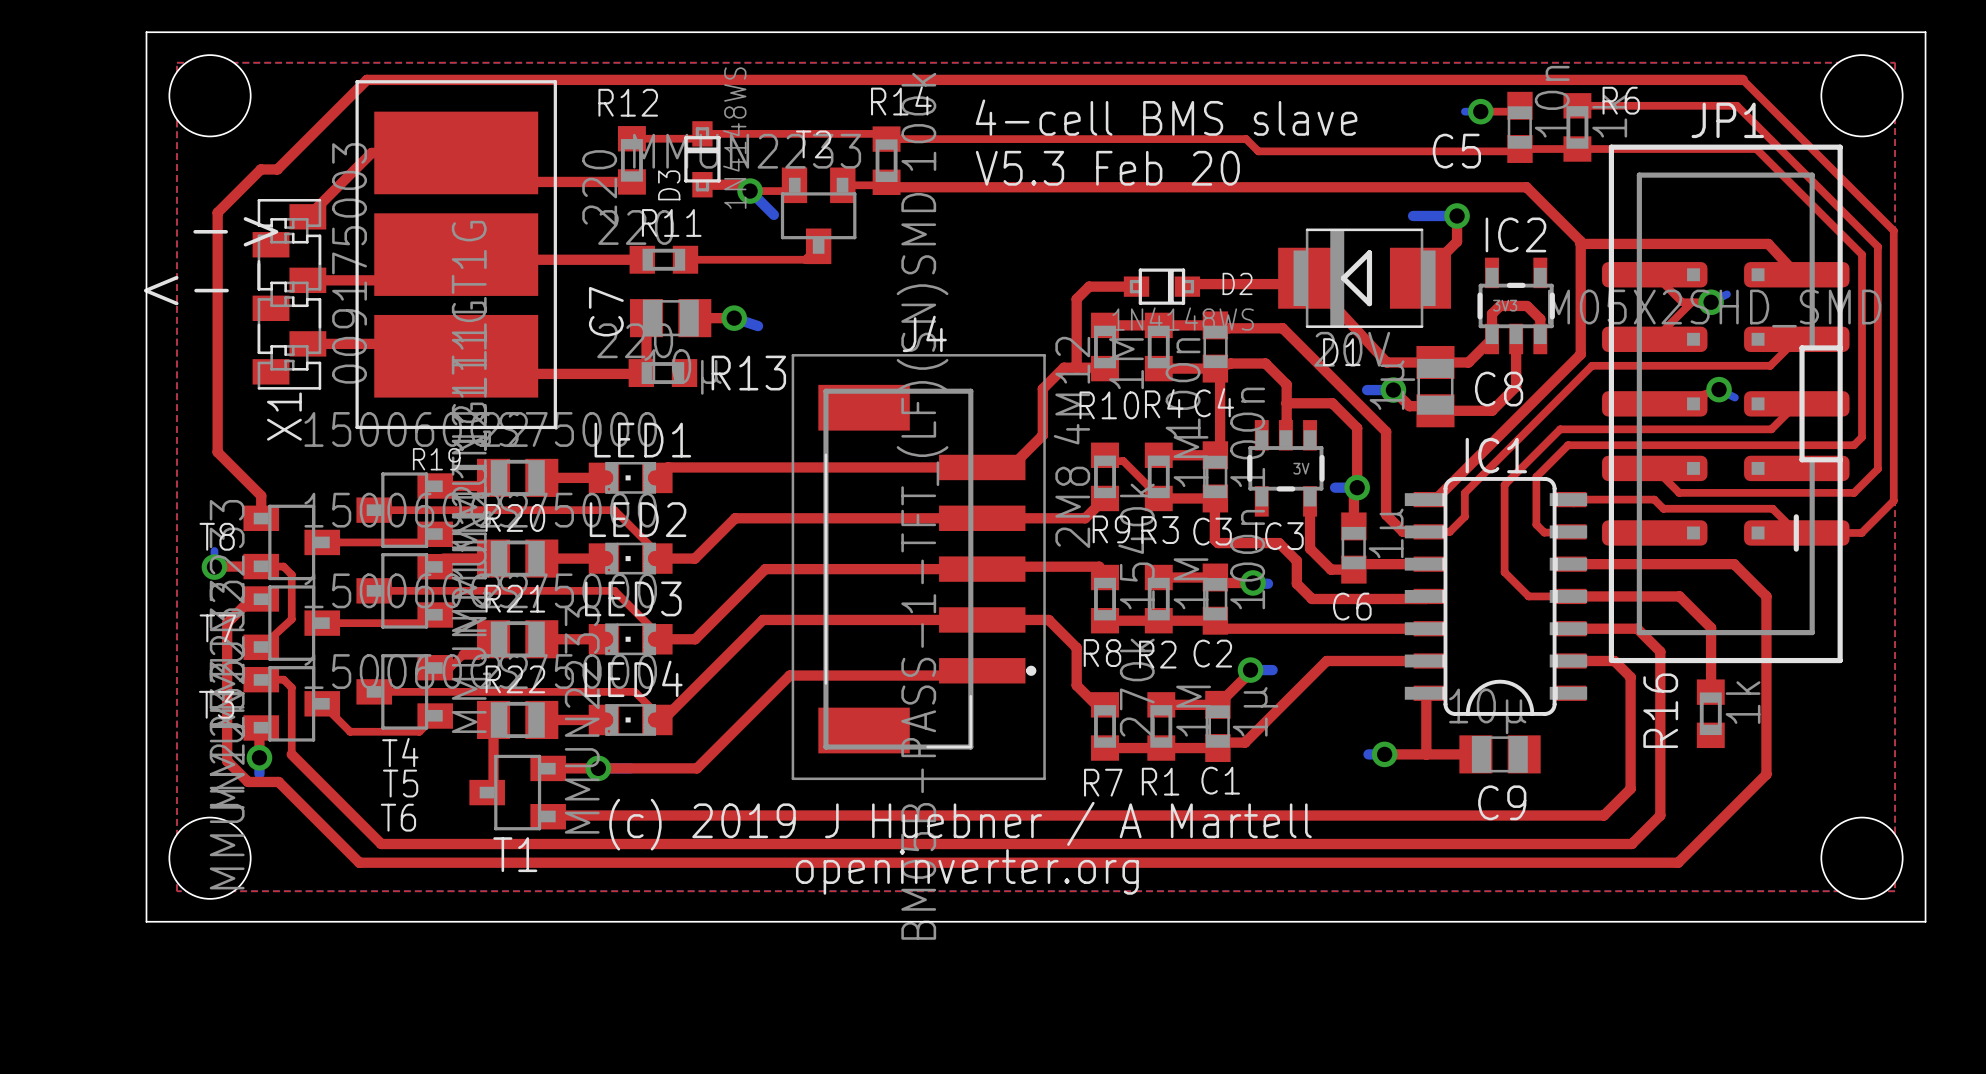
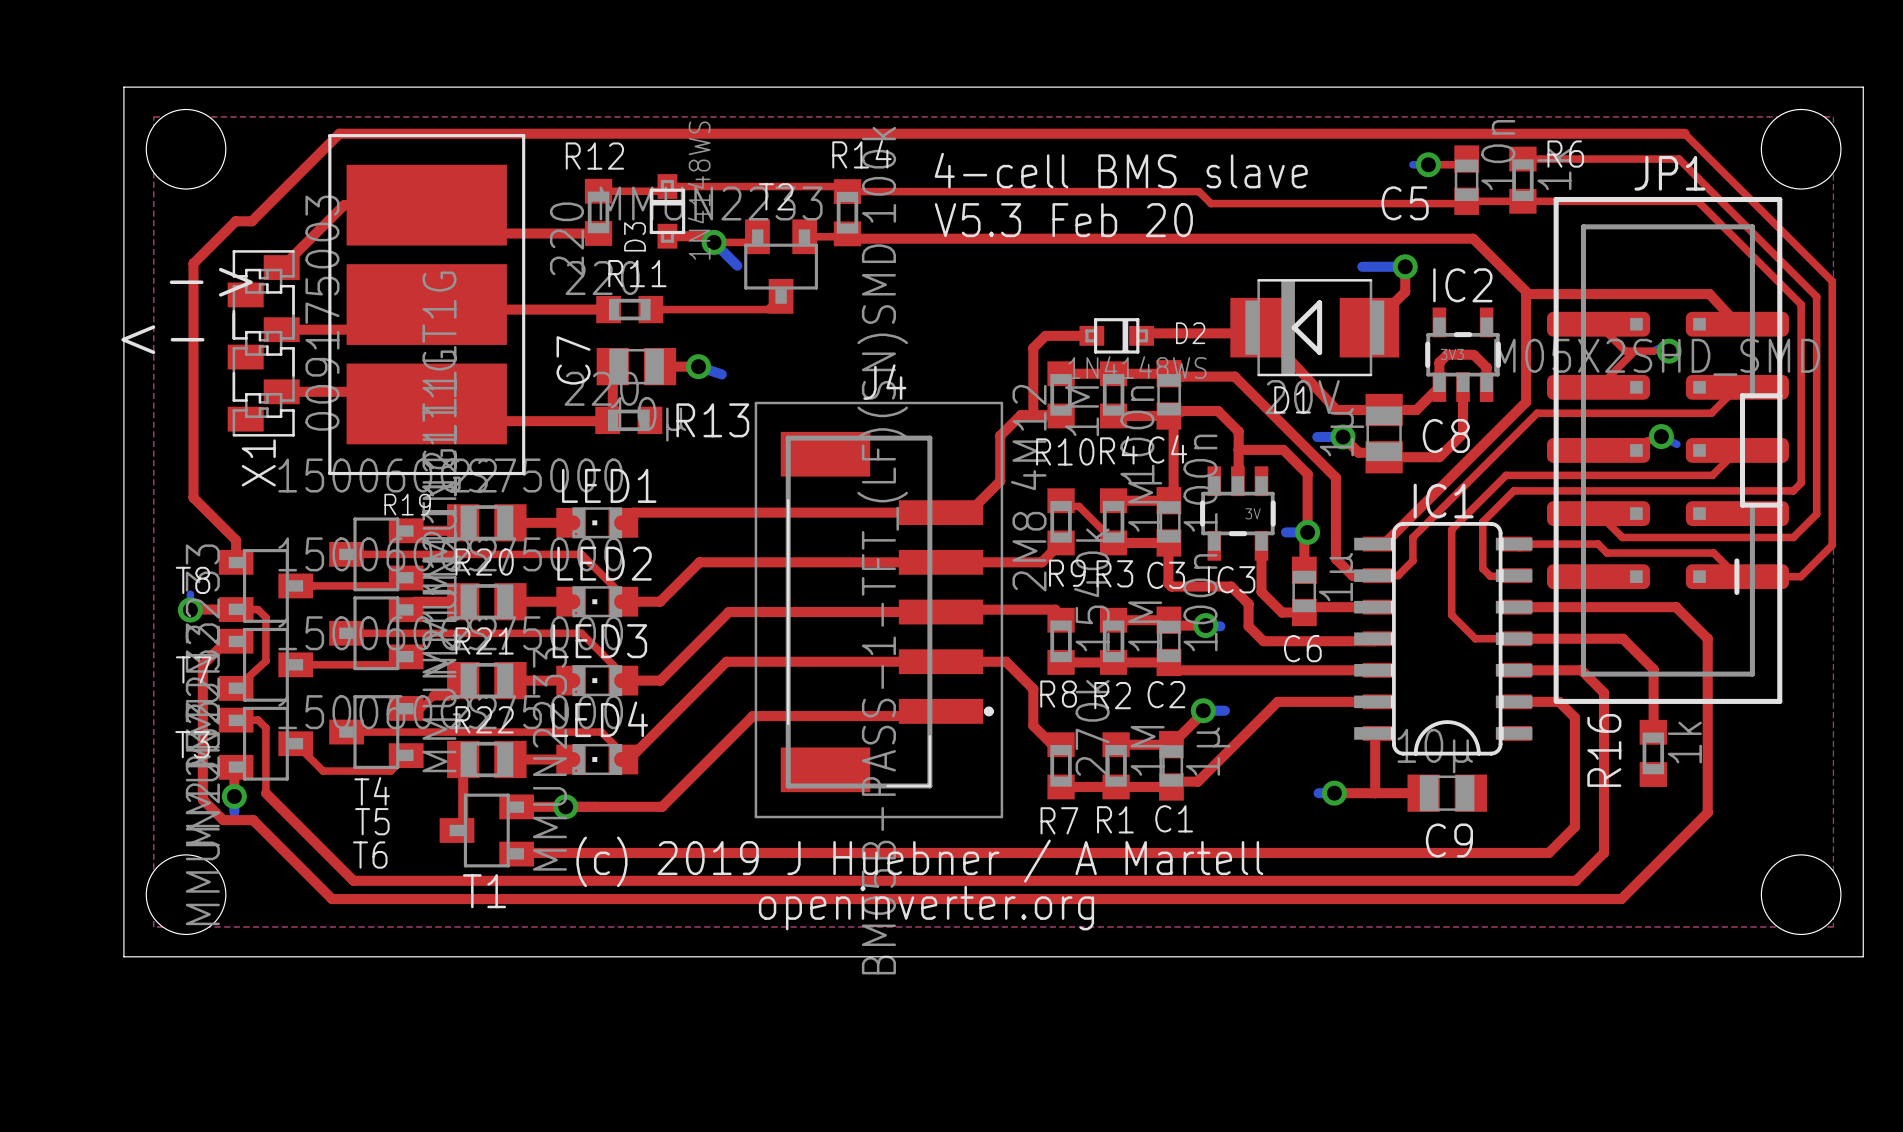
via position: (1711, 302) -> (1669, 351)

